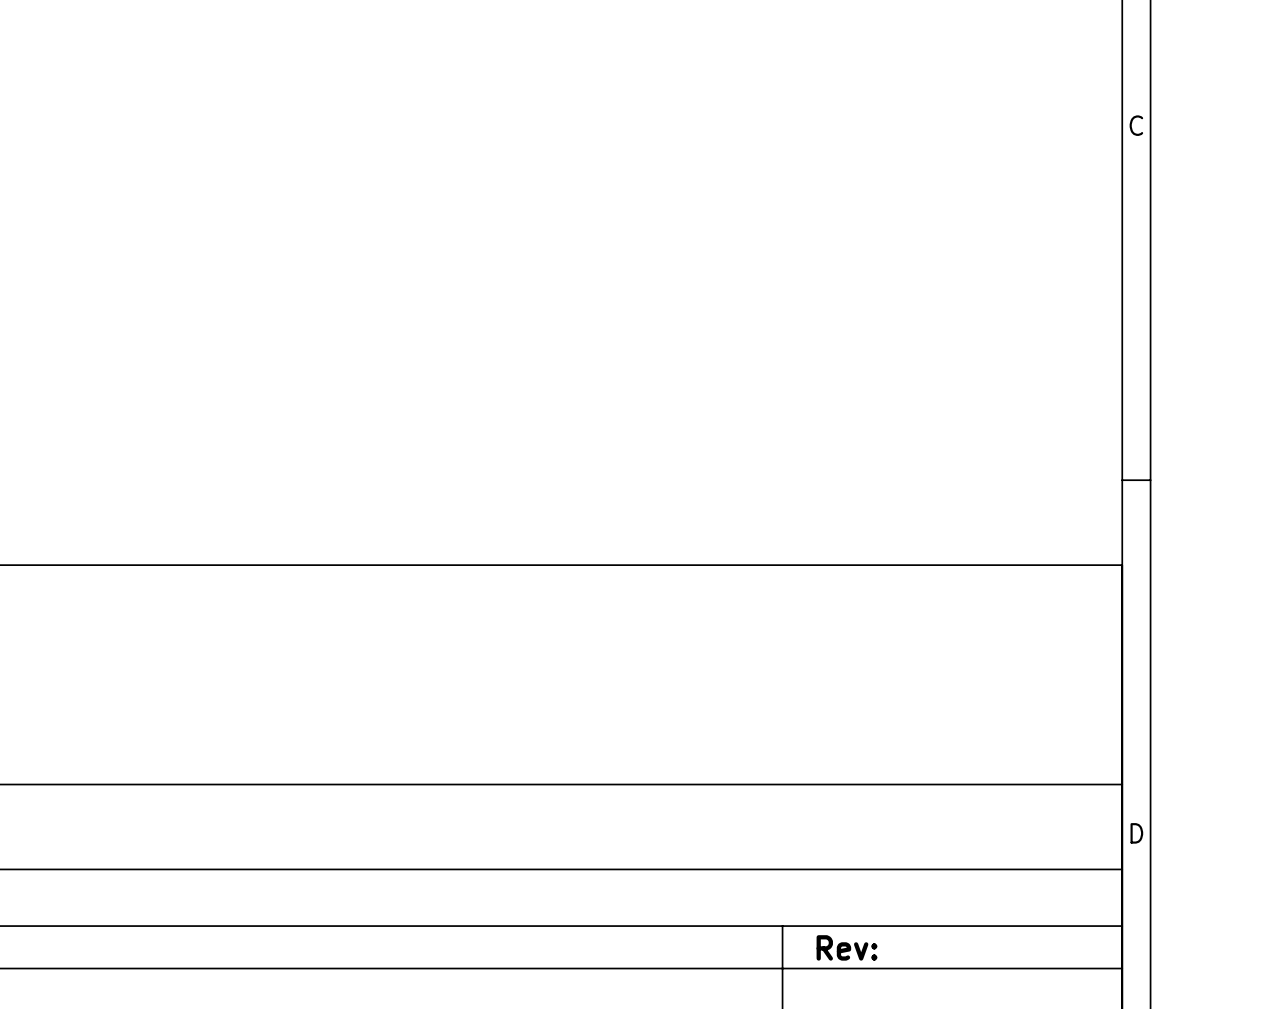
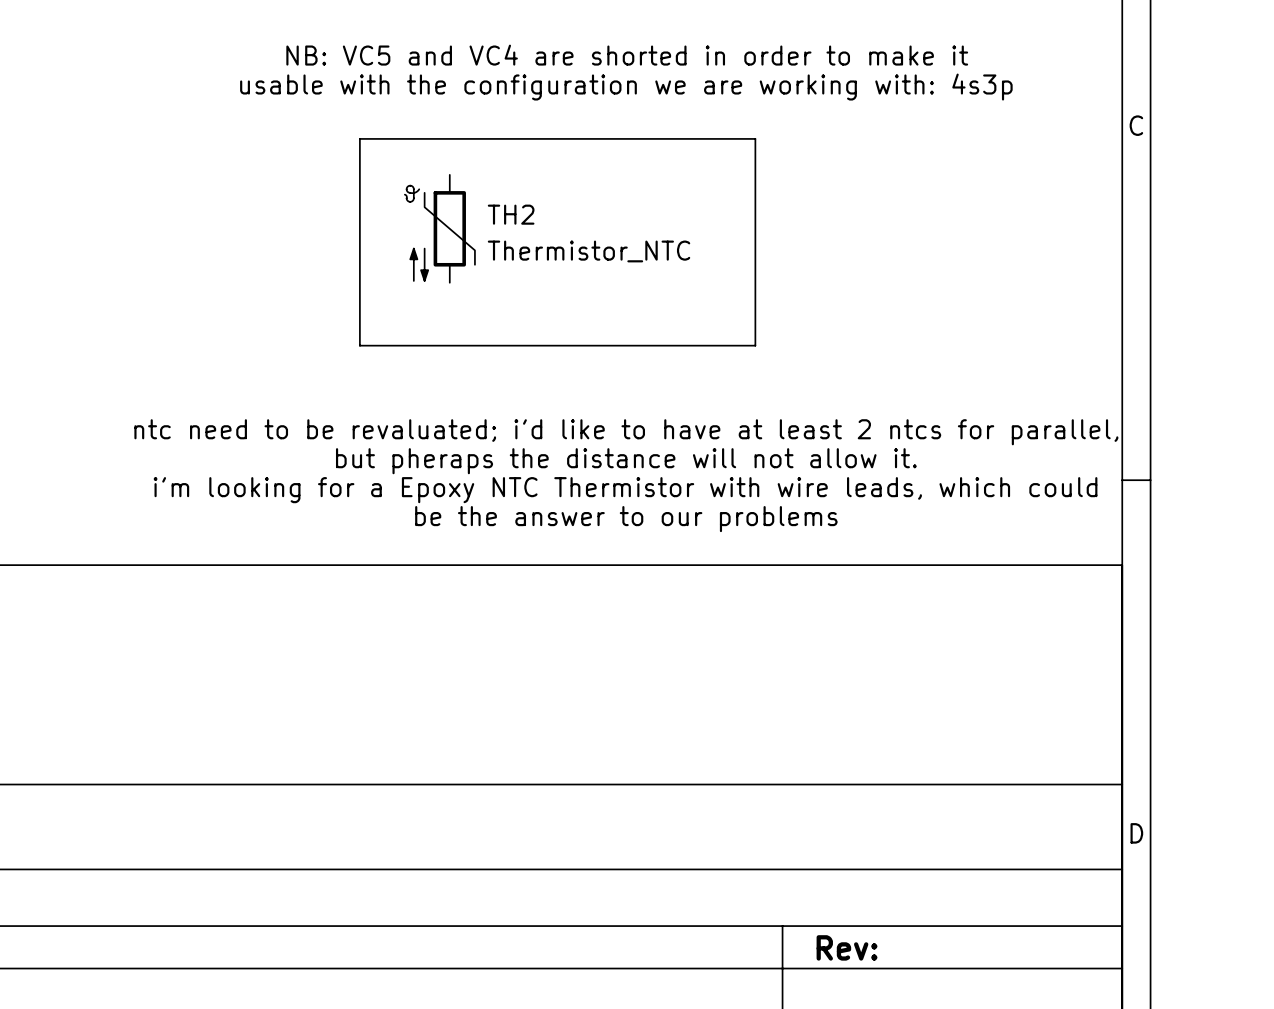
text: none -> NB: VC5 and VC4 are shorted in order to make it (627, 55)
text: none -> usable with the configuration we are working with: 4s3p (626, 87)
line: none -> (359, 138) (755, 138) (755, 345) (359, 345) (359, 138)
TH2: none -> Thermistor_NTC (439, 228)
text: none -> ntc need to be revaluated; i'd like to have at least 2 ntcs for parallel, (626, 432)
text: none -> but pheraps the distance will not allow it. (626, 461)
text: none -> i'm looking for a Epoxy NTC Thermistor with wire leads, which could (625, 490)
text: none -> be the answer to our problems (626, 519)

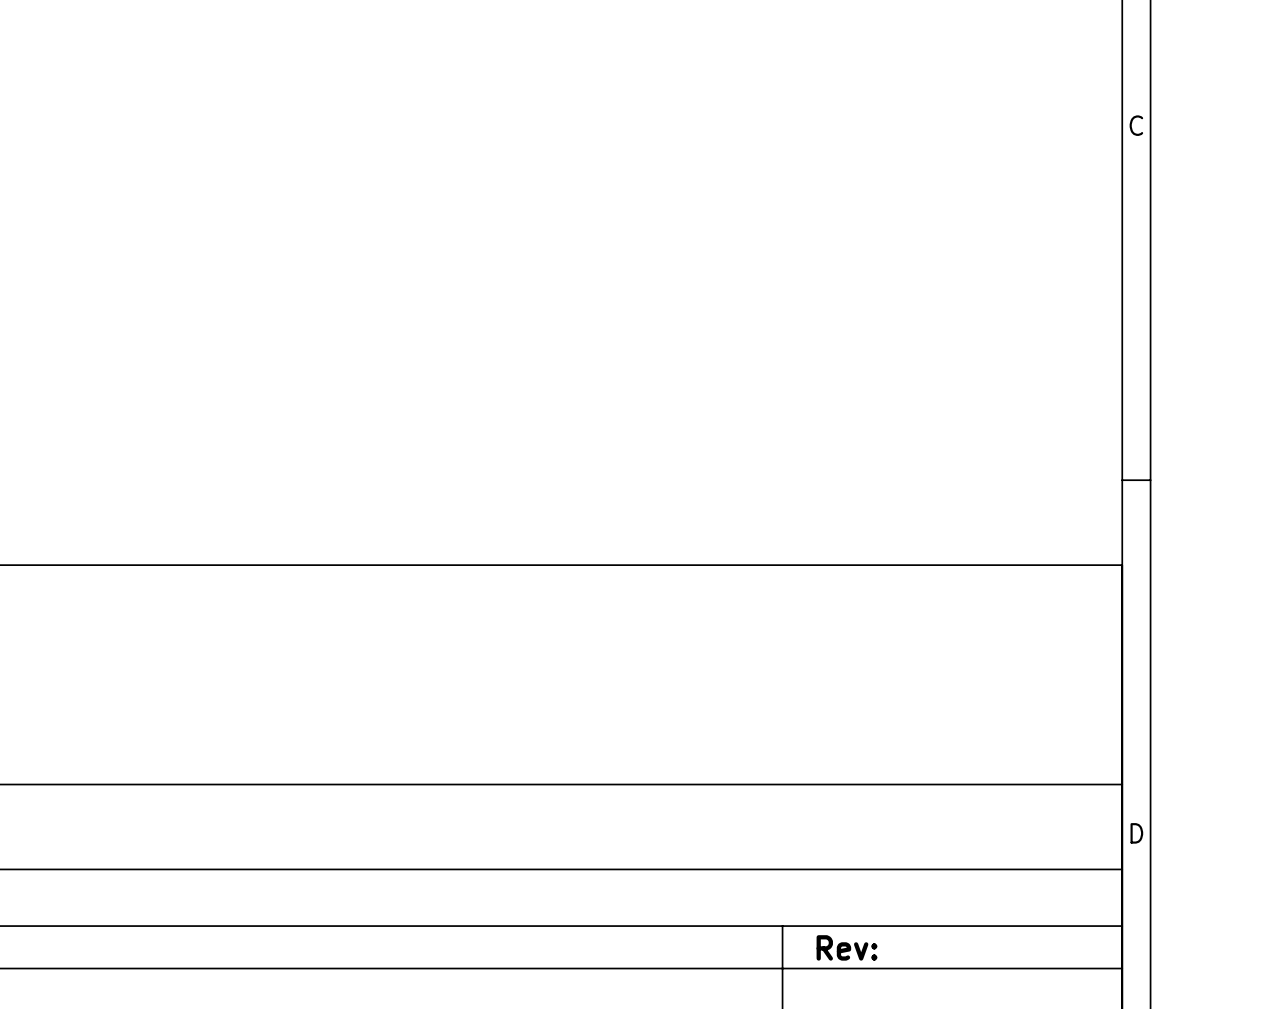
text: NB: VC5 and VC4 are shorted in order to make it (627, 55) -> none
text: usable with the configuration we are working with: 4s3p (626, 87) -> none
line: (359, 138) (755, 138) (755, 345) (359, 345) (359, 138) -> none
TH2: Thermistor_NTC (439, 228) -> none
text: ntc need to be revaluated; i'd like to have at least 2 ntcs for parallel, (626, 432) -> none
text: but pheraps the distance will not allow it. (626, 461) -> none
text: i'm looking for a Epoxy NTC Thermistor with wire leads, which could (625, 490) -> none
text: be the answer to our problems (626, 519) -> none

